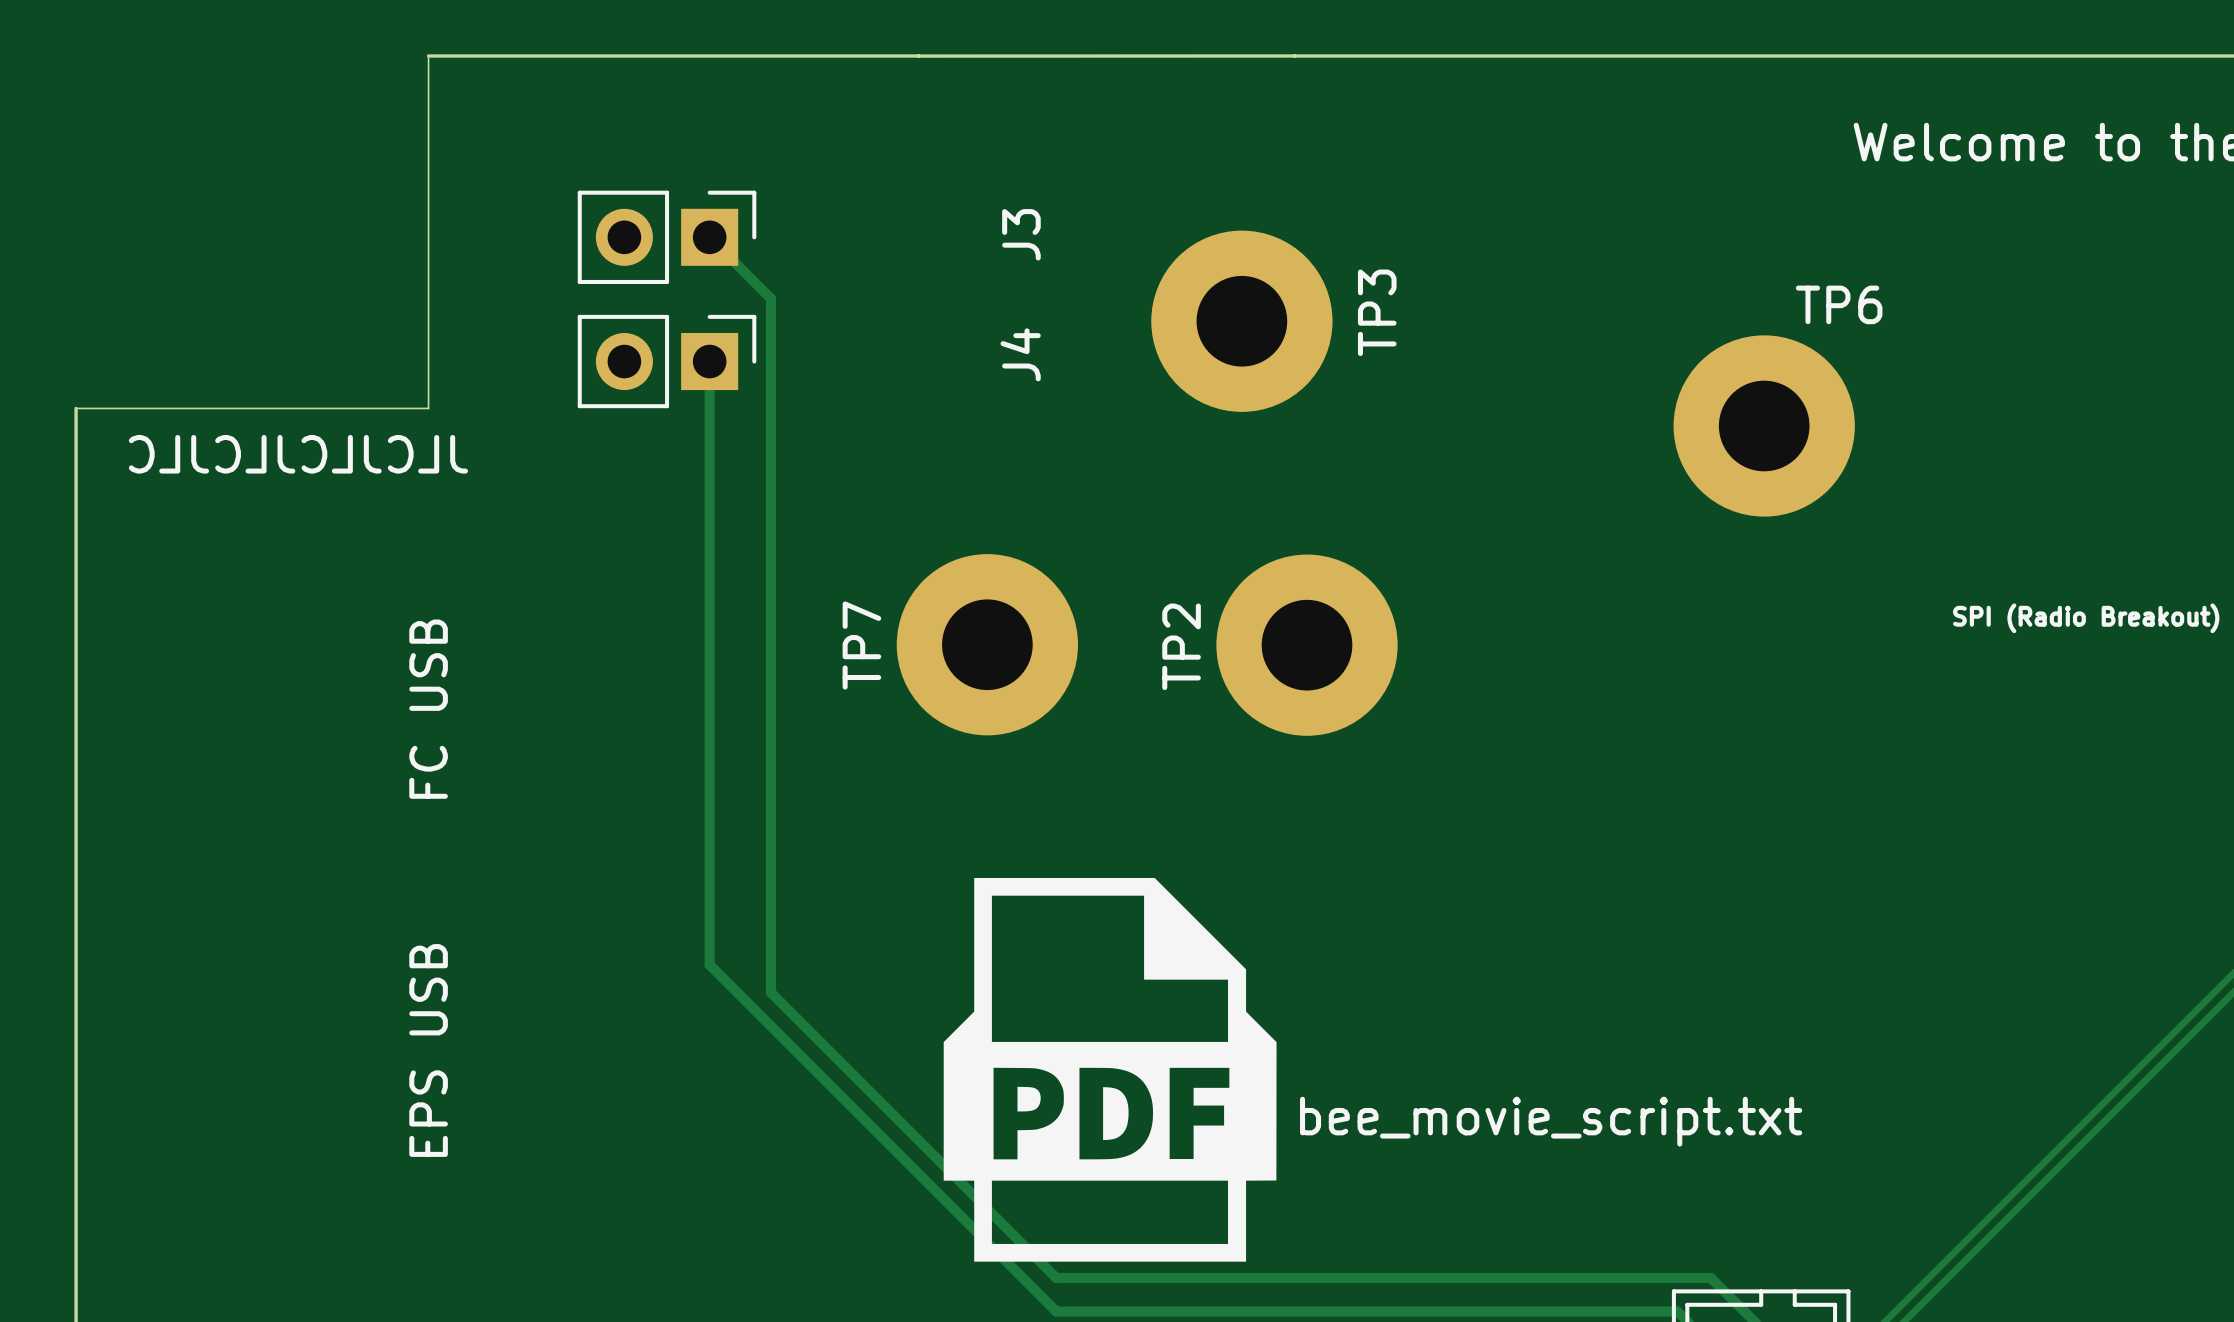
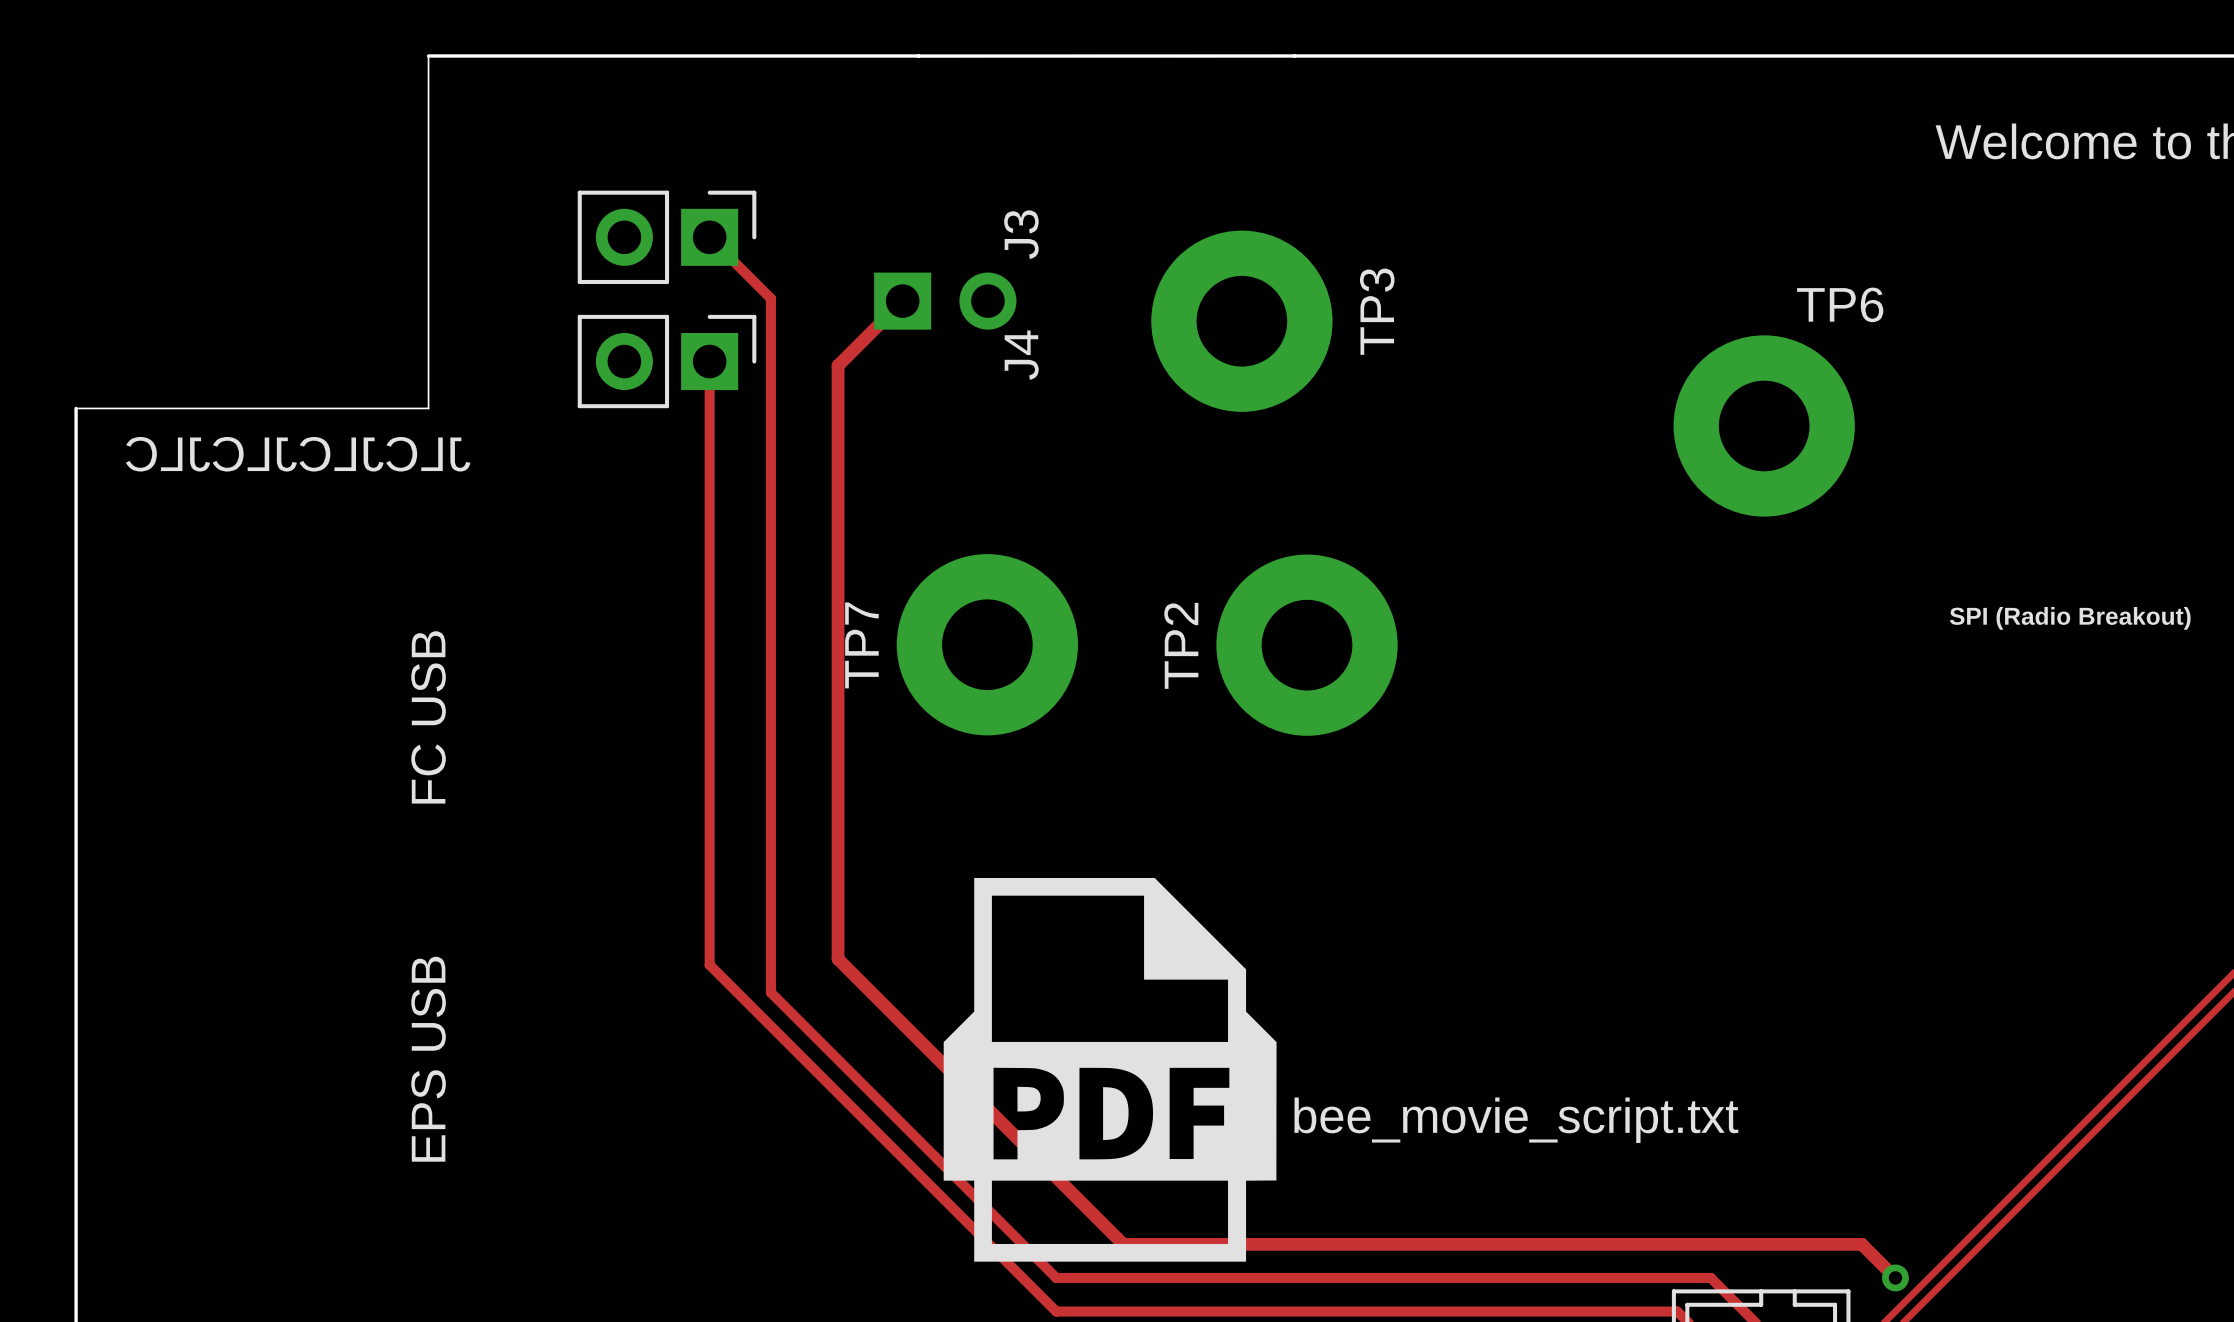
track: none -> (902, 301) (838, 365) (838, 959) (1123, 1244) (1861, 1244) (1895, 1277)
part: none -> (945, 301)
via: none -> (1895, 1277)

